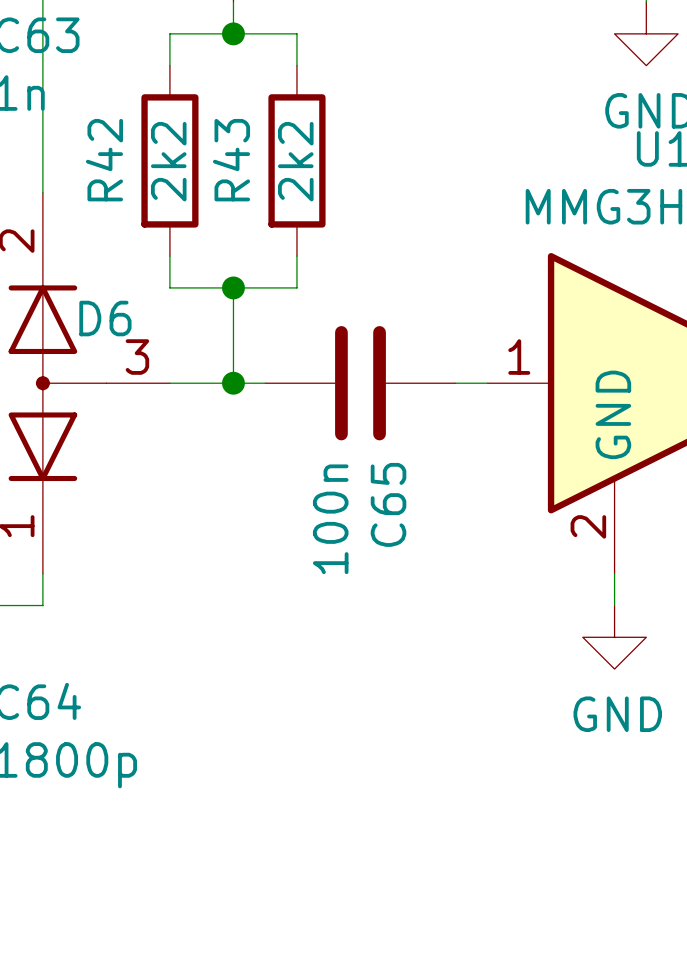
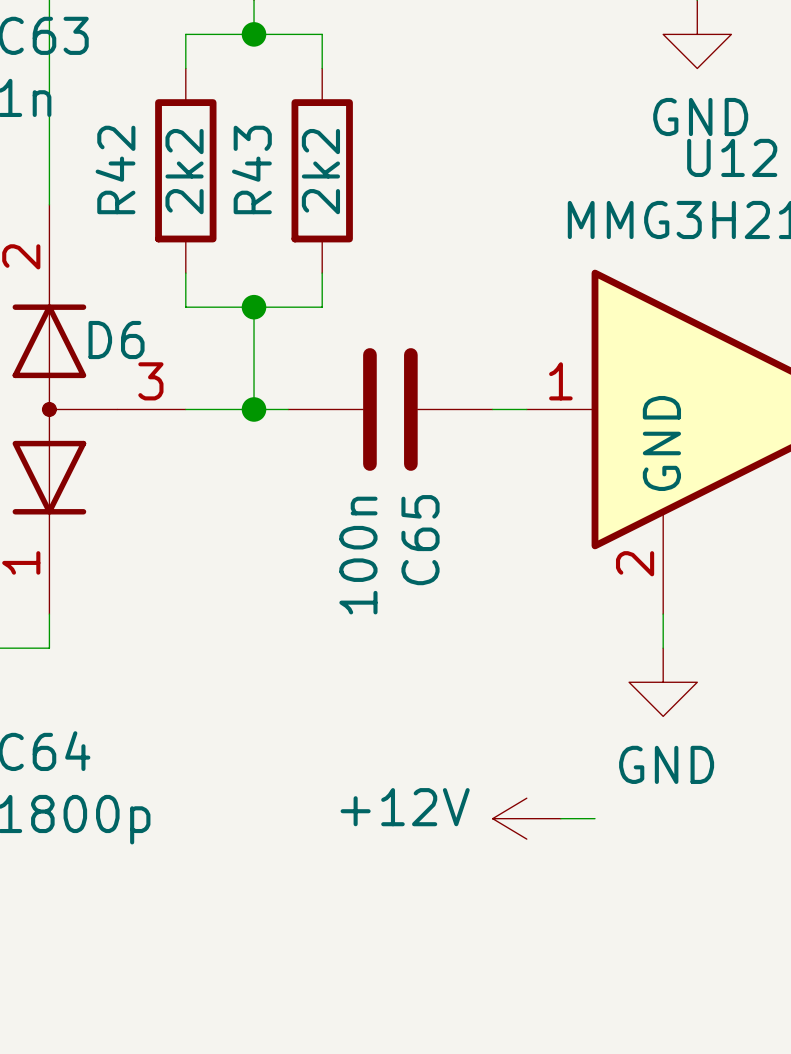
power symbol: none -> +12V (526, 818)
wire: none -> (560, 818) (594, 818)

